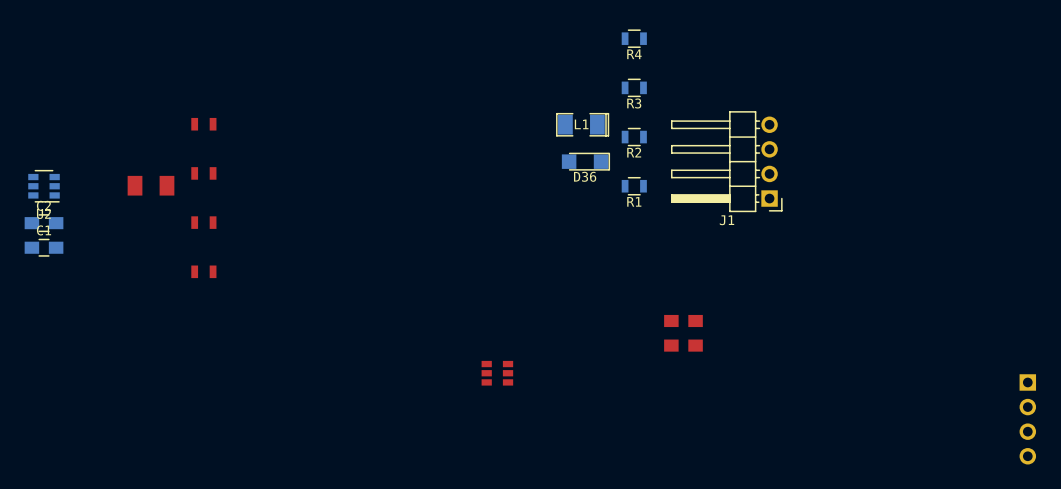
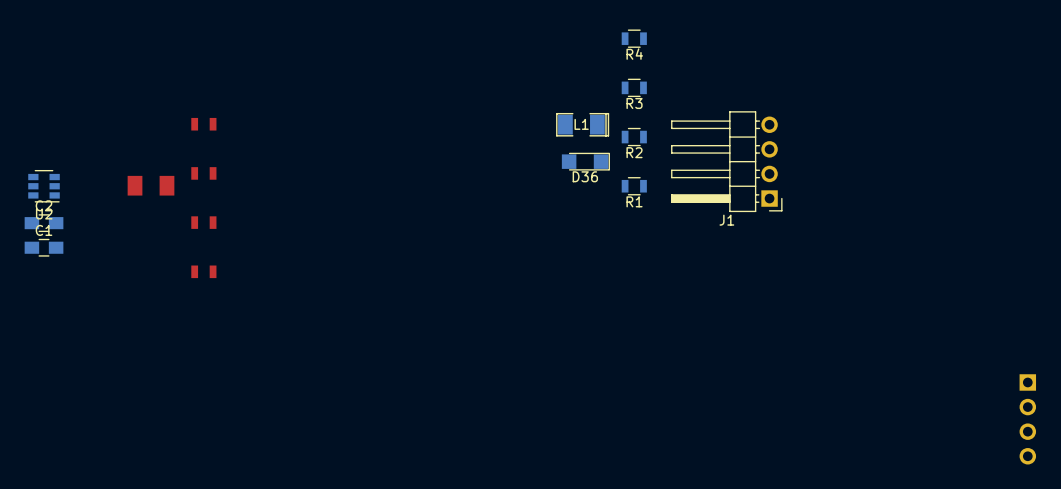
part: (683, 320) -> none
part: (683, 345) -> none
part: (497, 373) -> none

